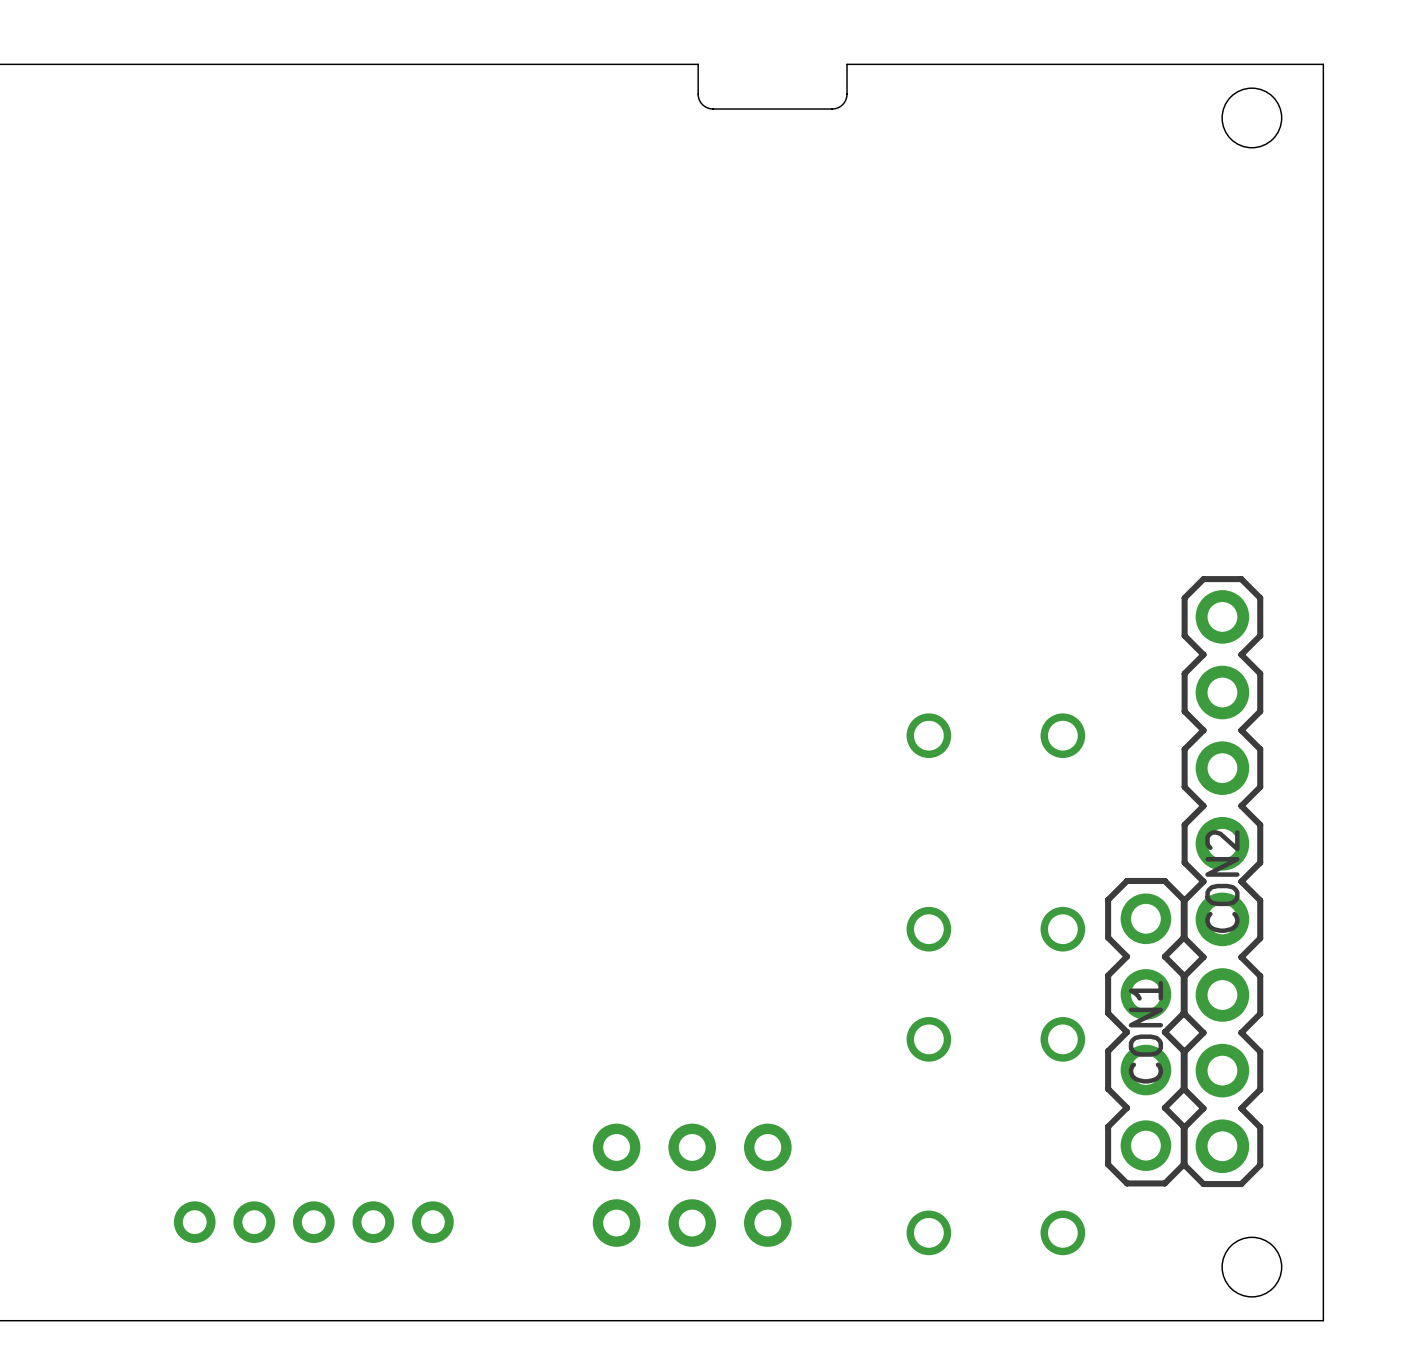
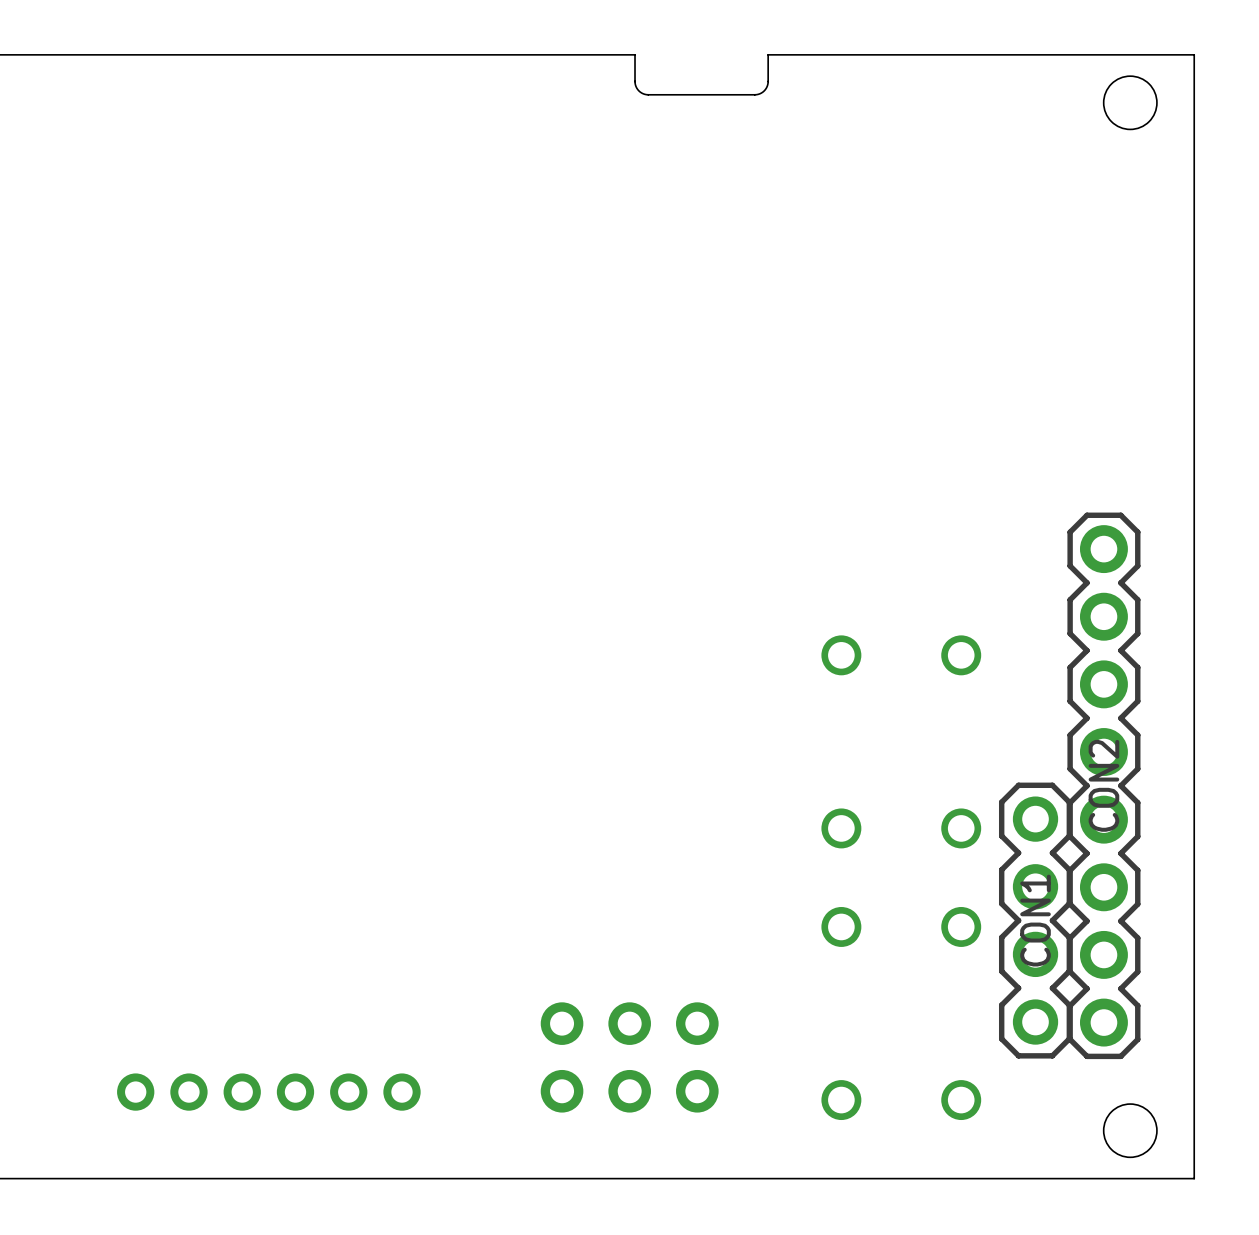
part footprint: [173, 1201, 454, 1243] -> [117, 1073, 421, 1111]

